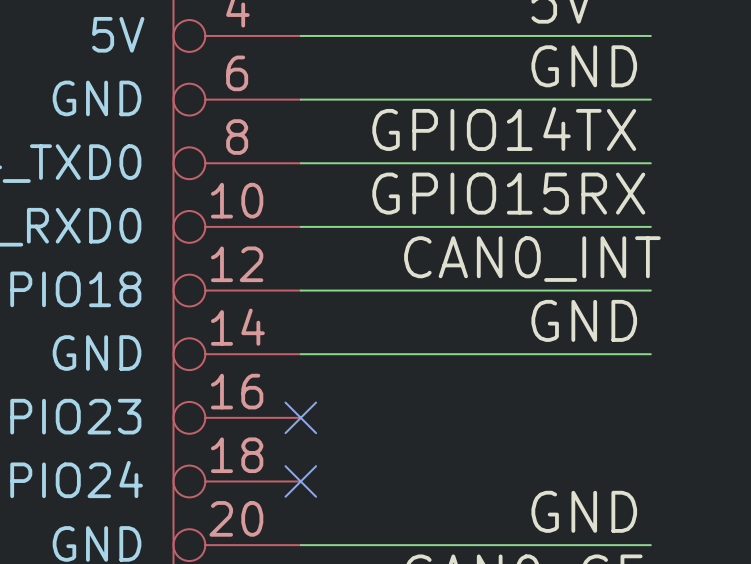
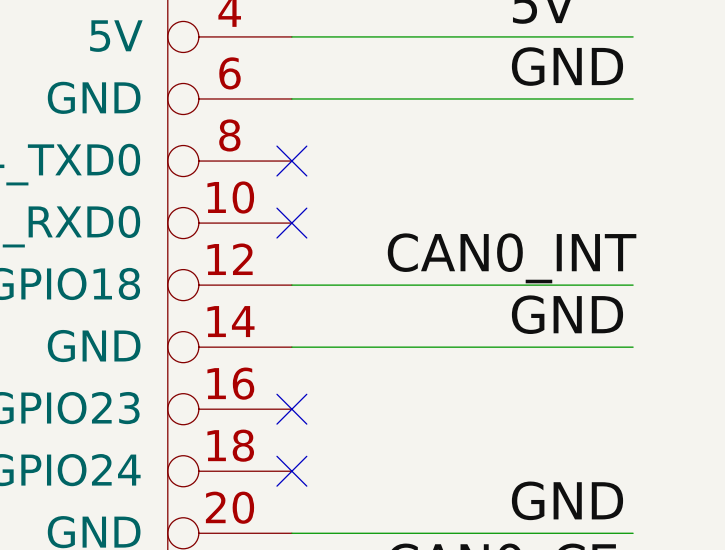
label: GPIO14TX (504, 129) -> none
wire: (300, 163) (650, 163) -> none
no-connect mark: none -> (291, 161)
label: GPIO15RX (508, 193) -> none
wire: (300, 226) (650, 226) -> none
no-connect mark: none -> (291, 223)

